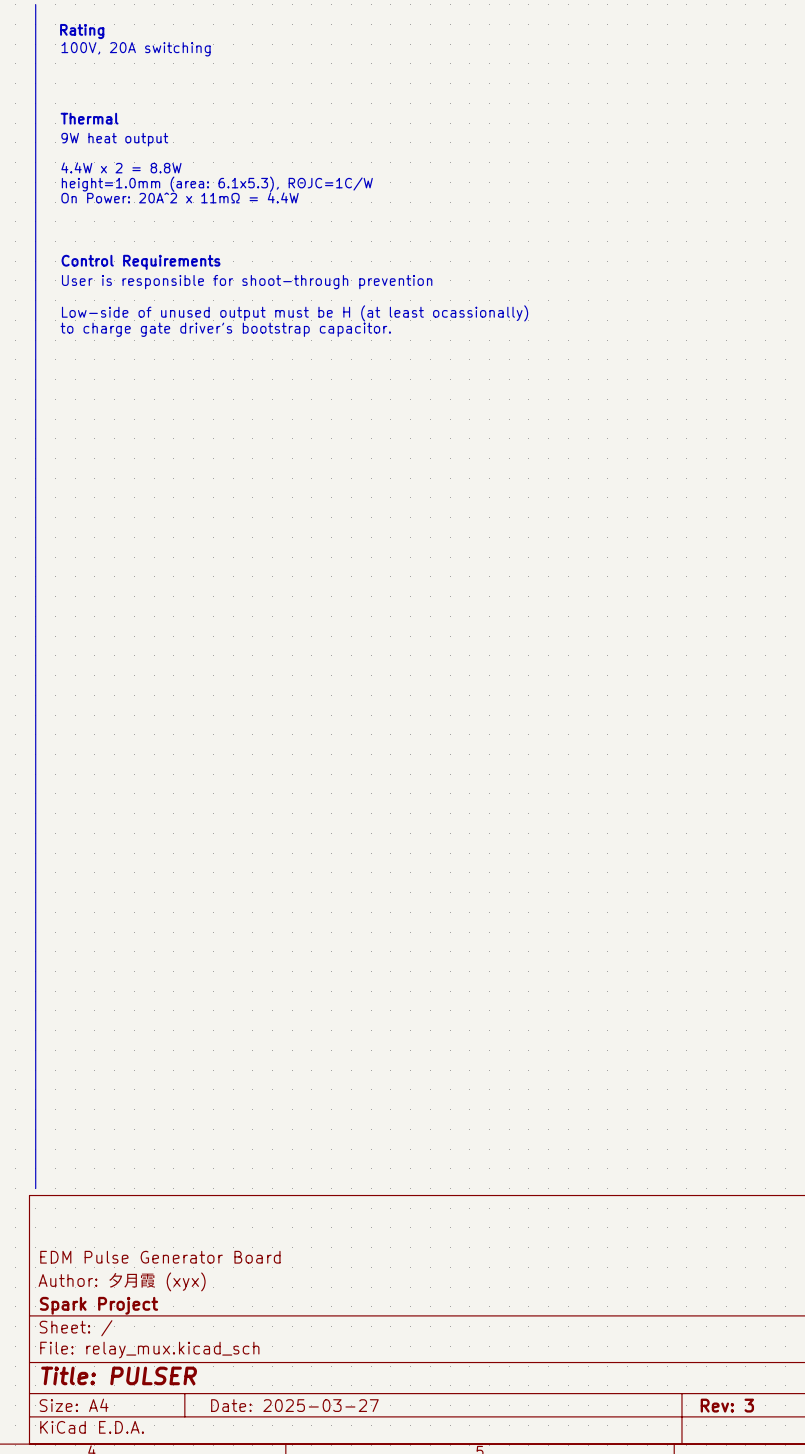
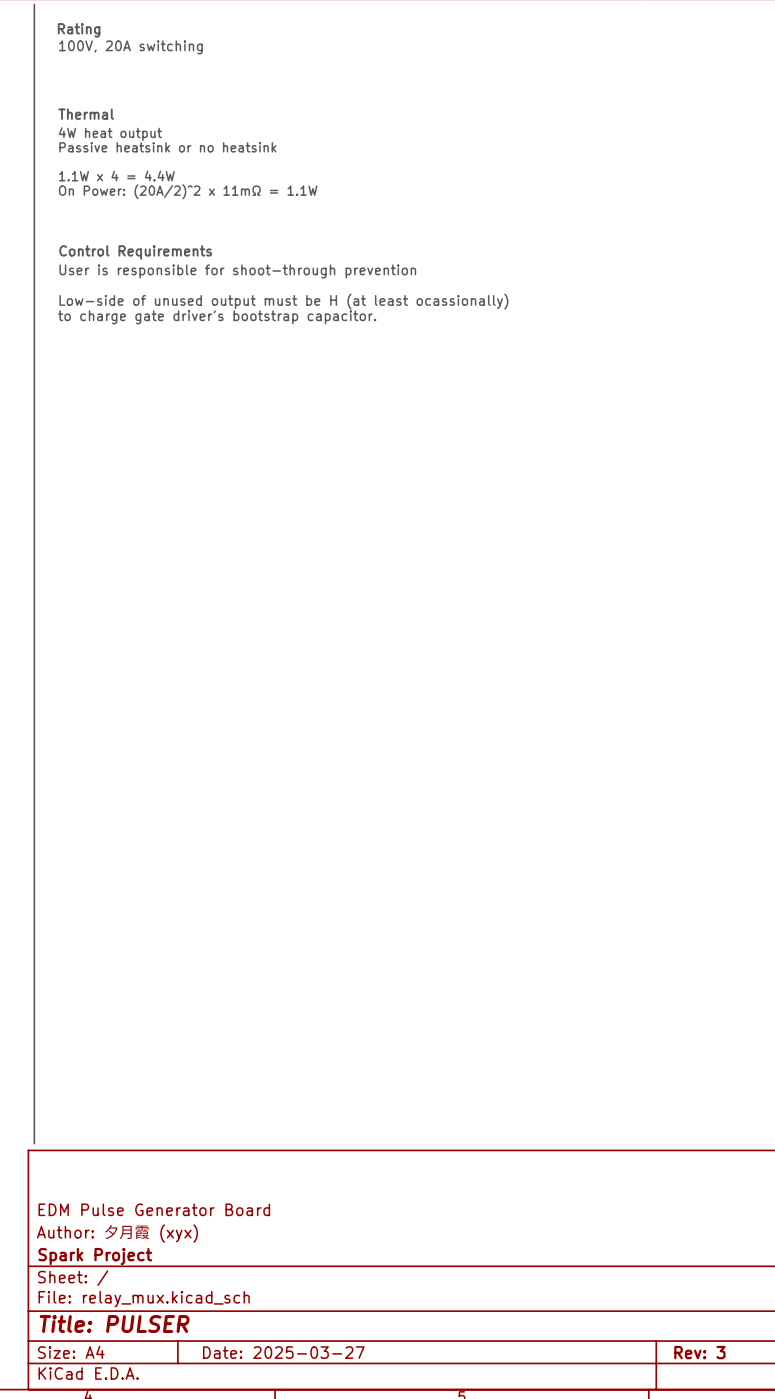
text: 9W heat output (114, 139) -> 4W heat output (110, 134)
text: none -> Passive heatsink or no heatsink (167, 147)
text: 4.4W x 2 = 8.8W (121, 167) -> none
text: height=1.0mm (area: 6.1x5.3), RΘJC=1C/W (217, 184) -> 1.1W x 4 = 4.4W (116, 175)
text: On Power: 20A^2 x 11mΩ = 4.4W (180, 197) -> On Power: (20A/2)^2 x 11mΩ = 1.1W (188, 191)

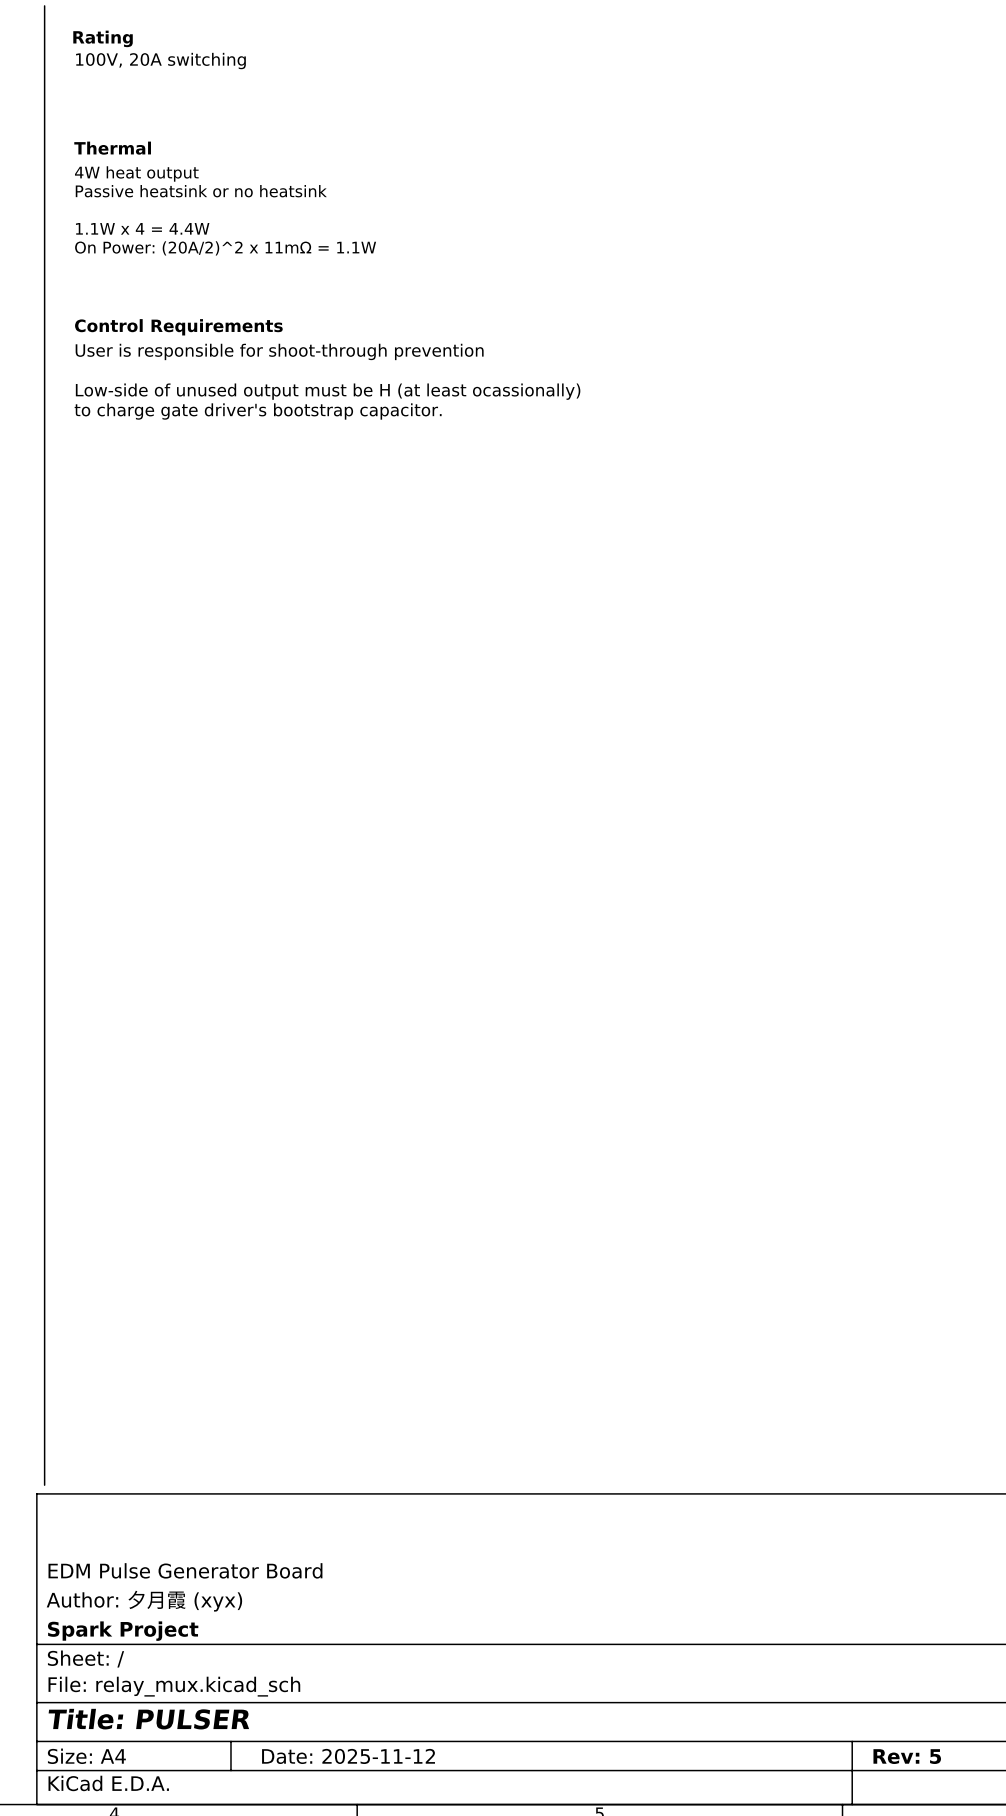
title block: Date: 2025-03-27 (283, 1352) -> Date: 2025-11-12 (348, 1756)
title block: Rev: 3 (699, 1352) -> Rev: 5 (907, 1756)

